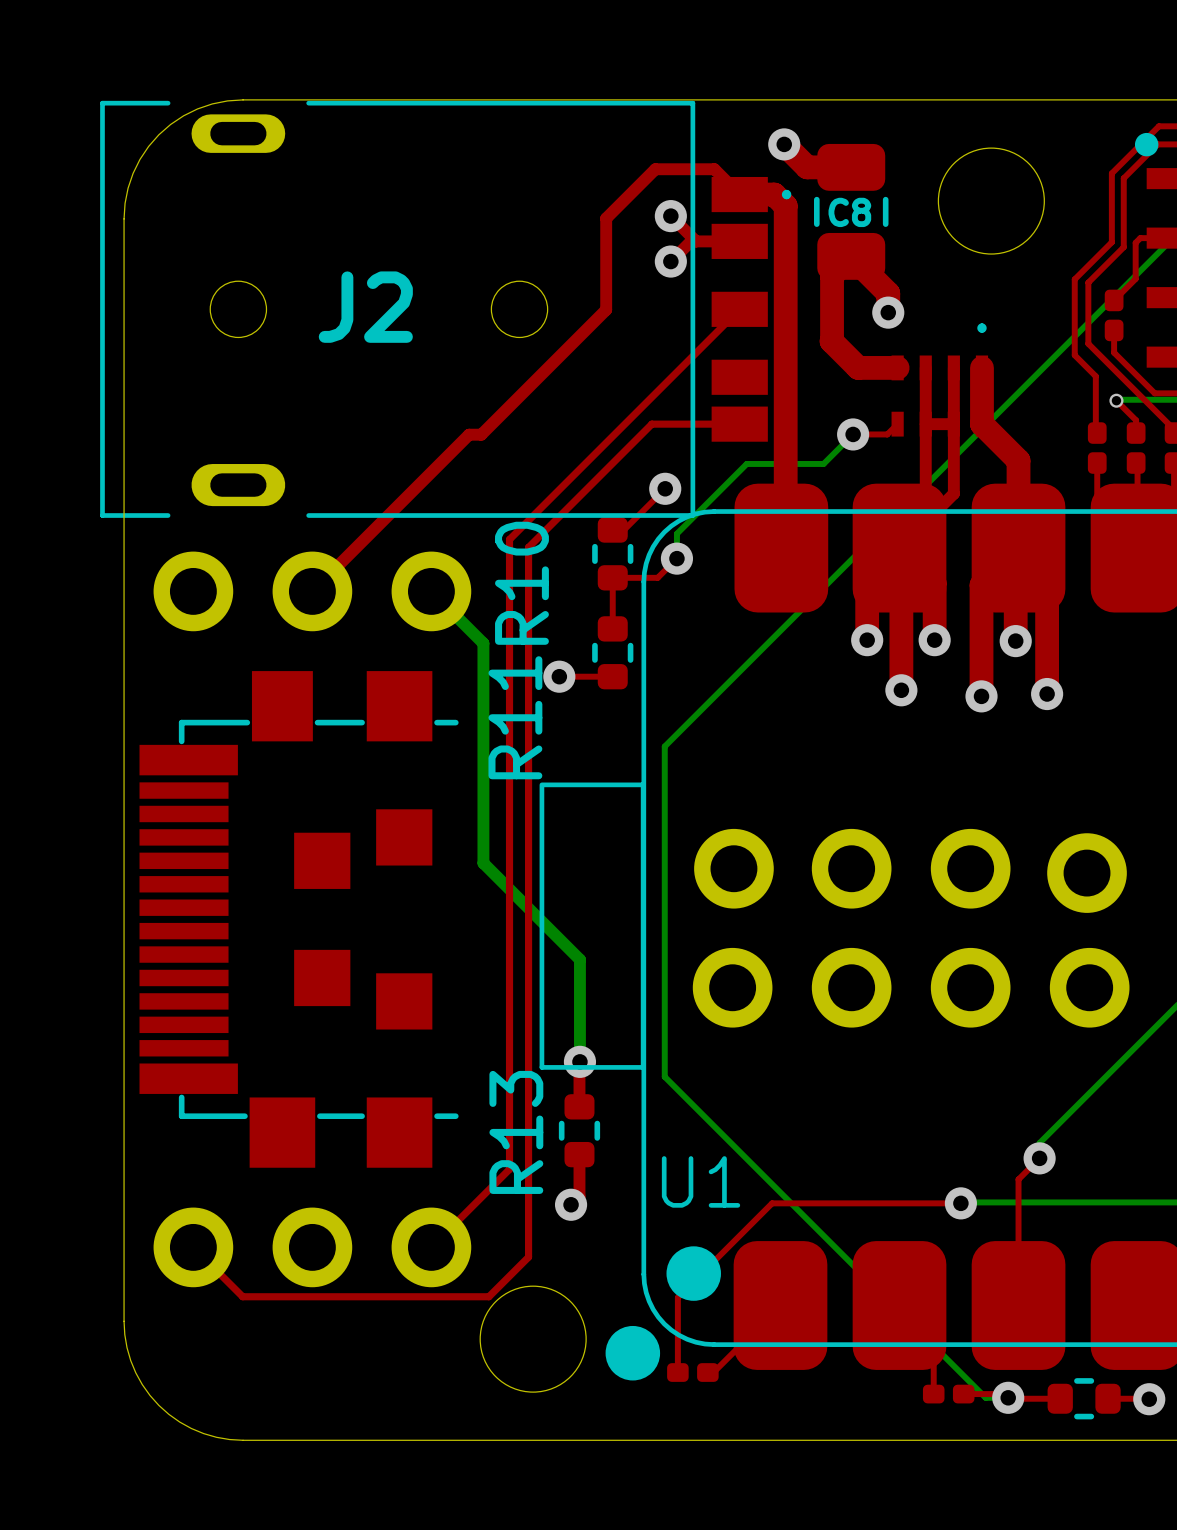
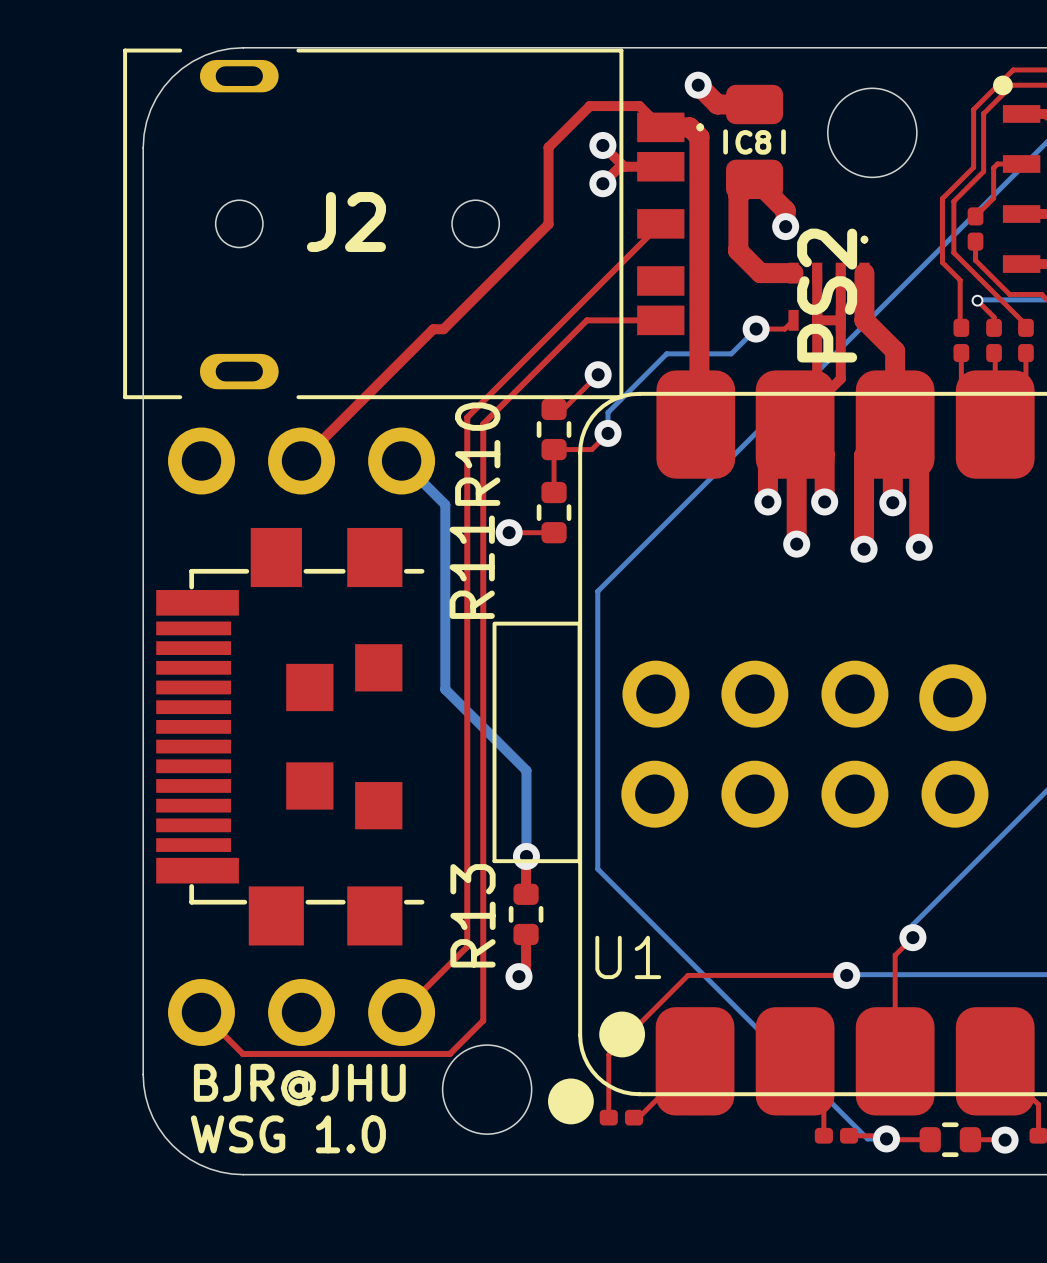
PS2 name: none -> PS2 (827, 295)
text: none -> BJR@JHU (299, 1085)
text: none -> WSG 1.0 (288, 1134)

